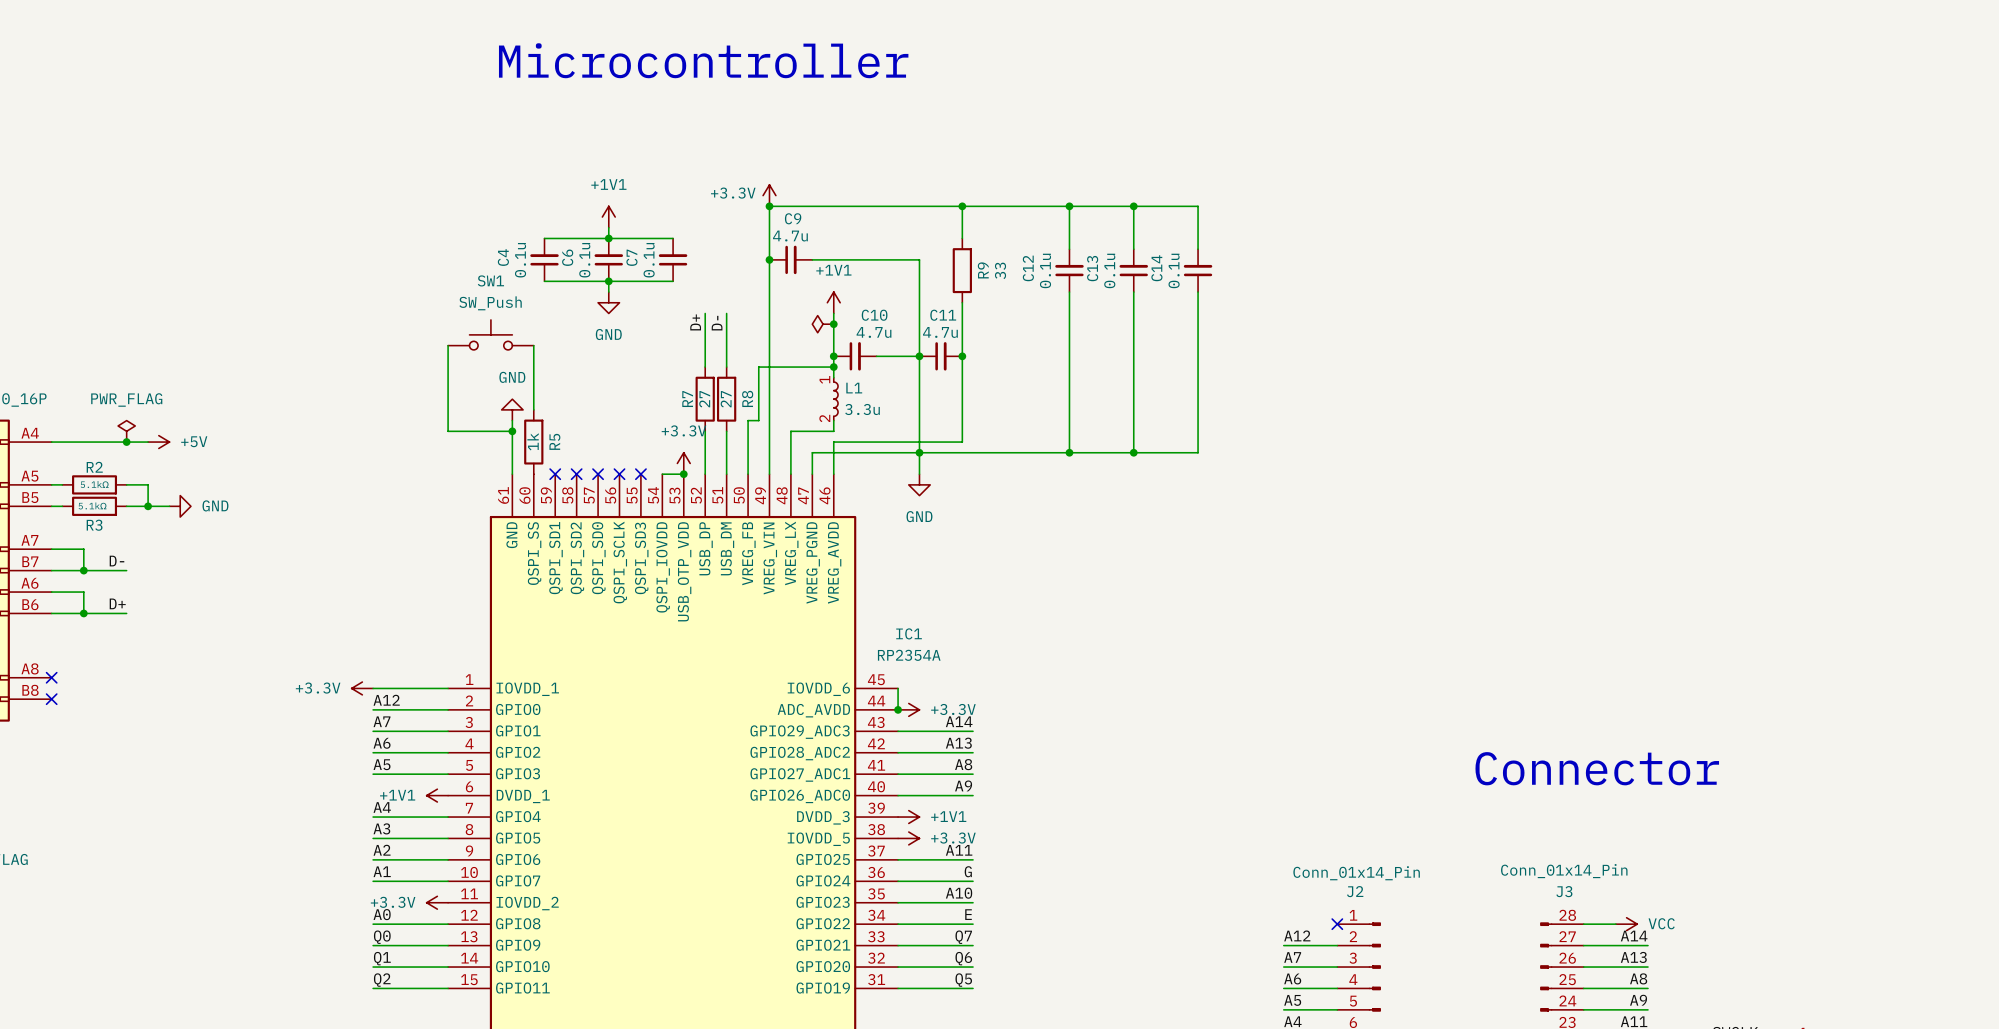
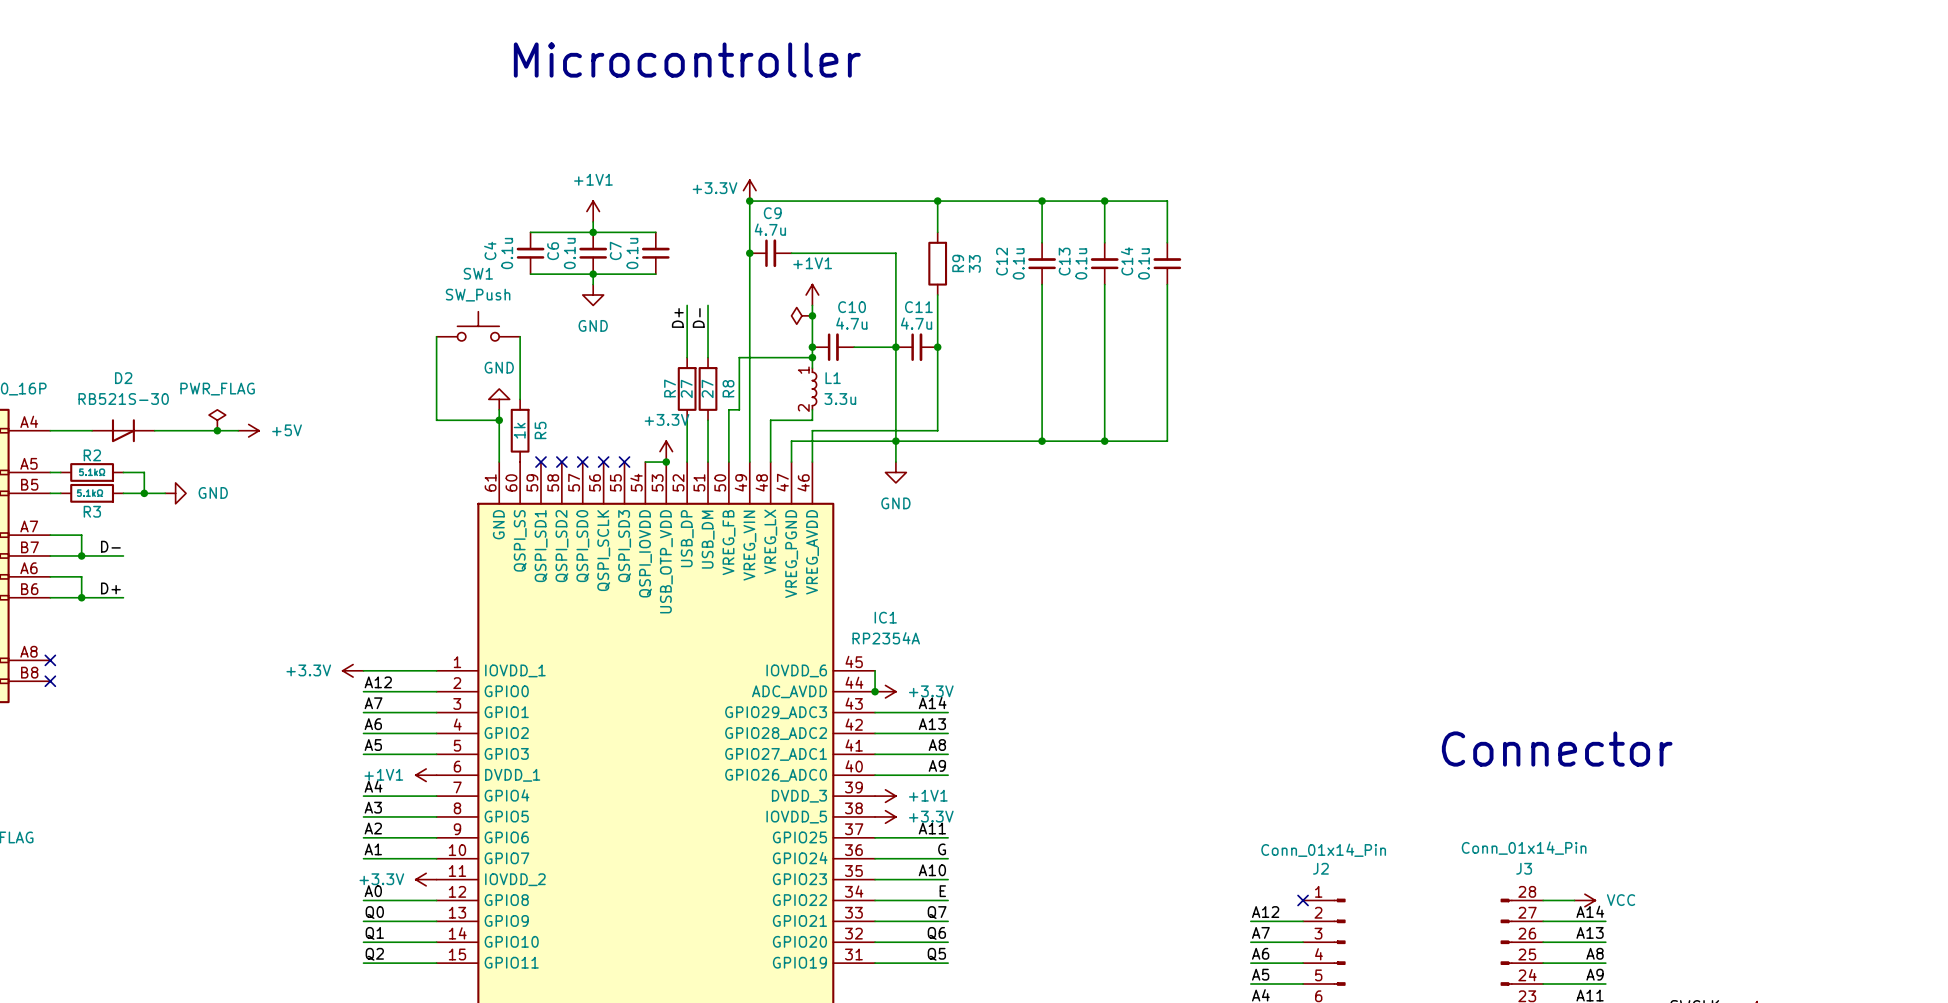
power symbol position: PWR_FLAG (126, 431) -> PWR_FLAG (217, 420)
junction: (126, 442) -> none
D2: none -> RB521S-30 (123, 430)
wire: none -> (154, 430) (238, 430)
power symbol position: +5V (158, 442) -> +5V (248, 430)
junction: none -> (217, 430)

